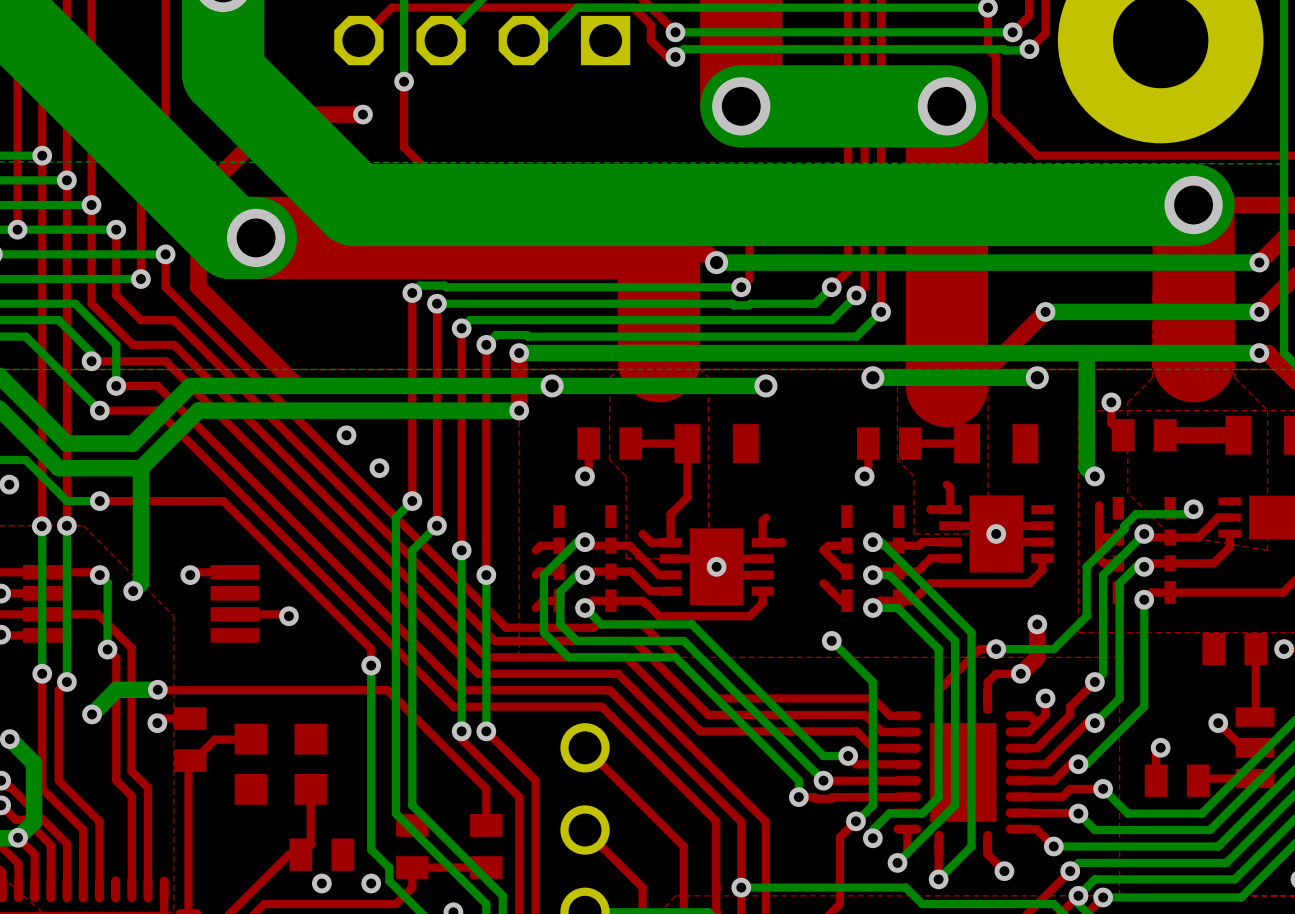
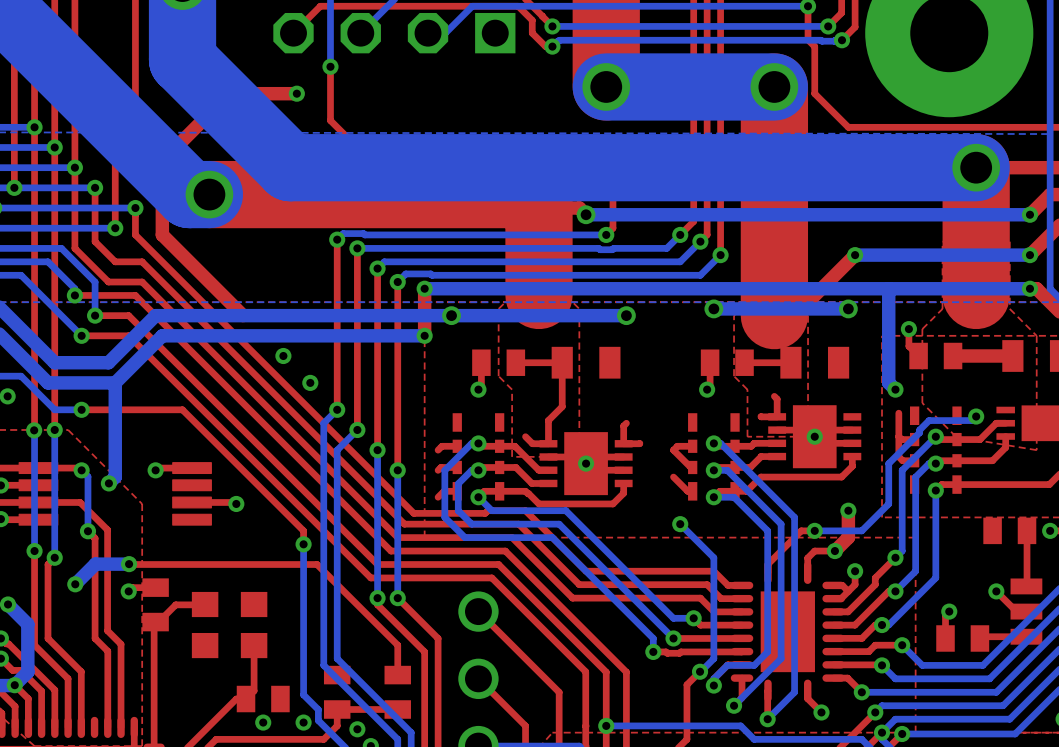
via: none -> (357, 729)

